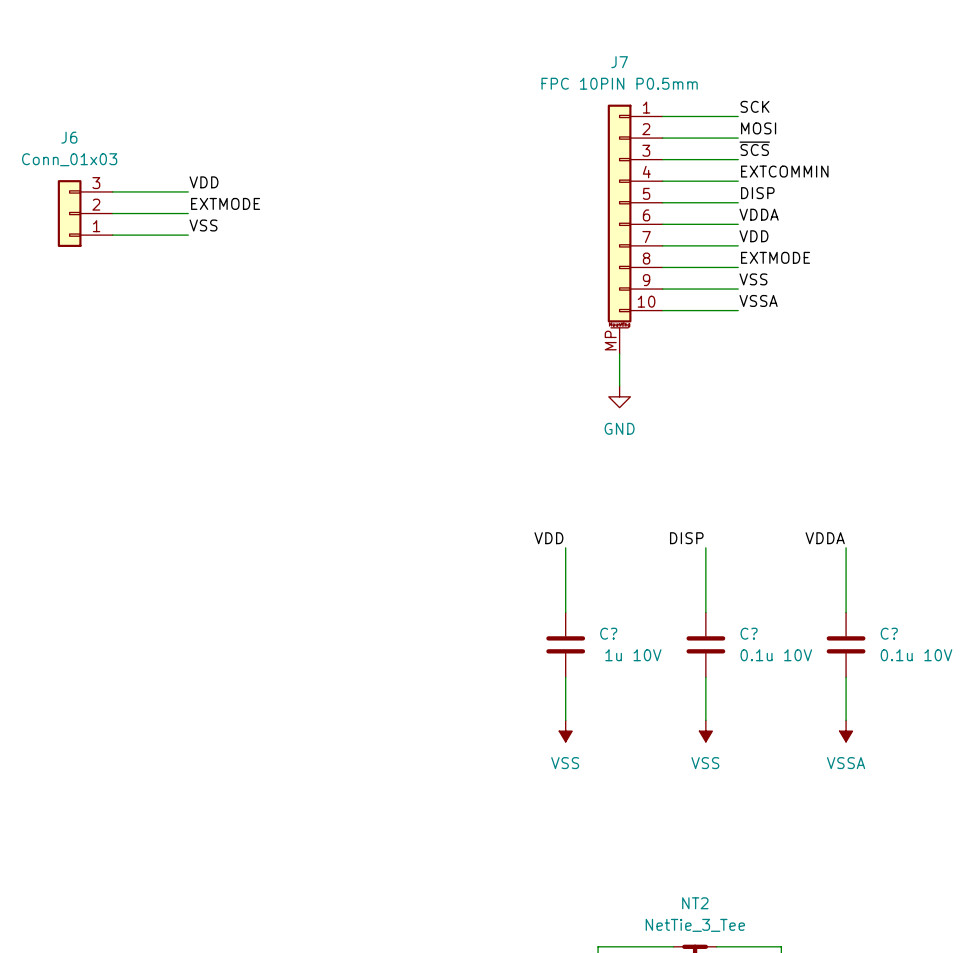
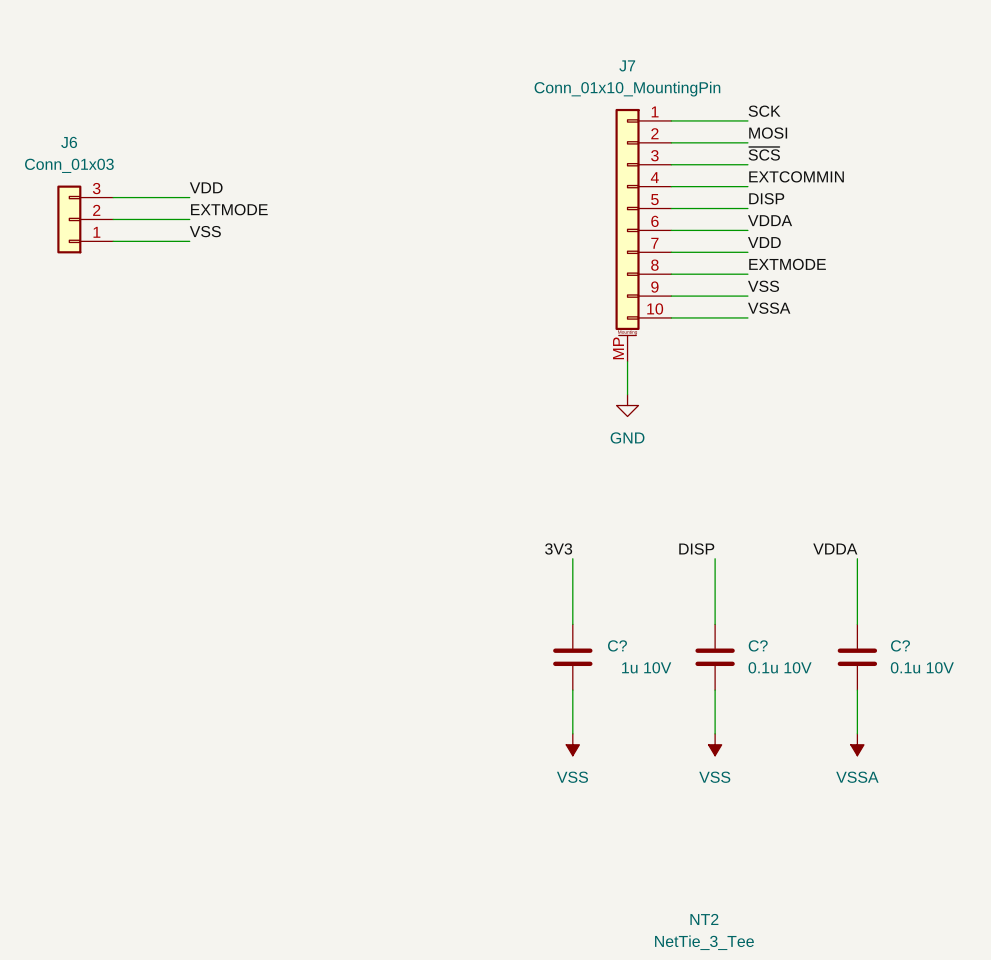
J7 value: FPC 10PIN P0.5mm (619, 83) -> Conn_01x10_MountingPin (627, 89)
label: VDD (548, 538) -> 3V3 (558, 548)

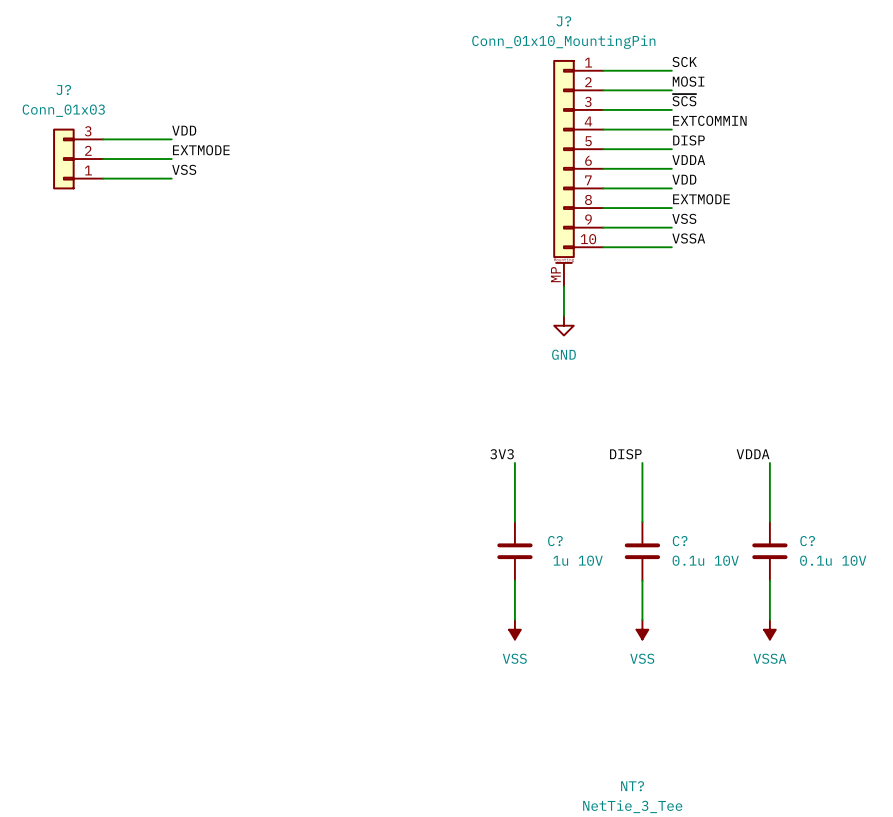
J7 name: J7 (627, 65) -> J? (563, 21)
J6 name: J6 (69, 142) -> J? (63, 89)
NT2 name: NT2 (704, 919) -> NT? (632, 786)

